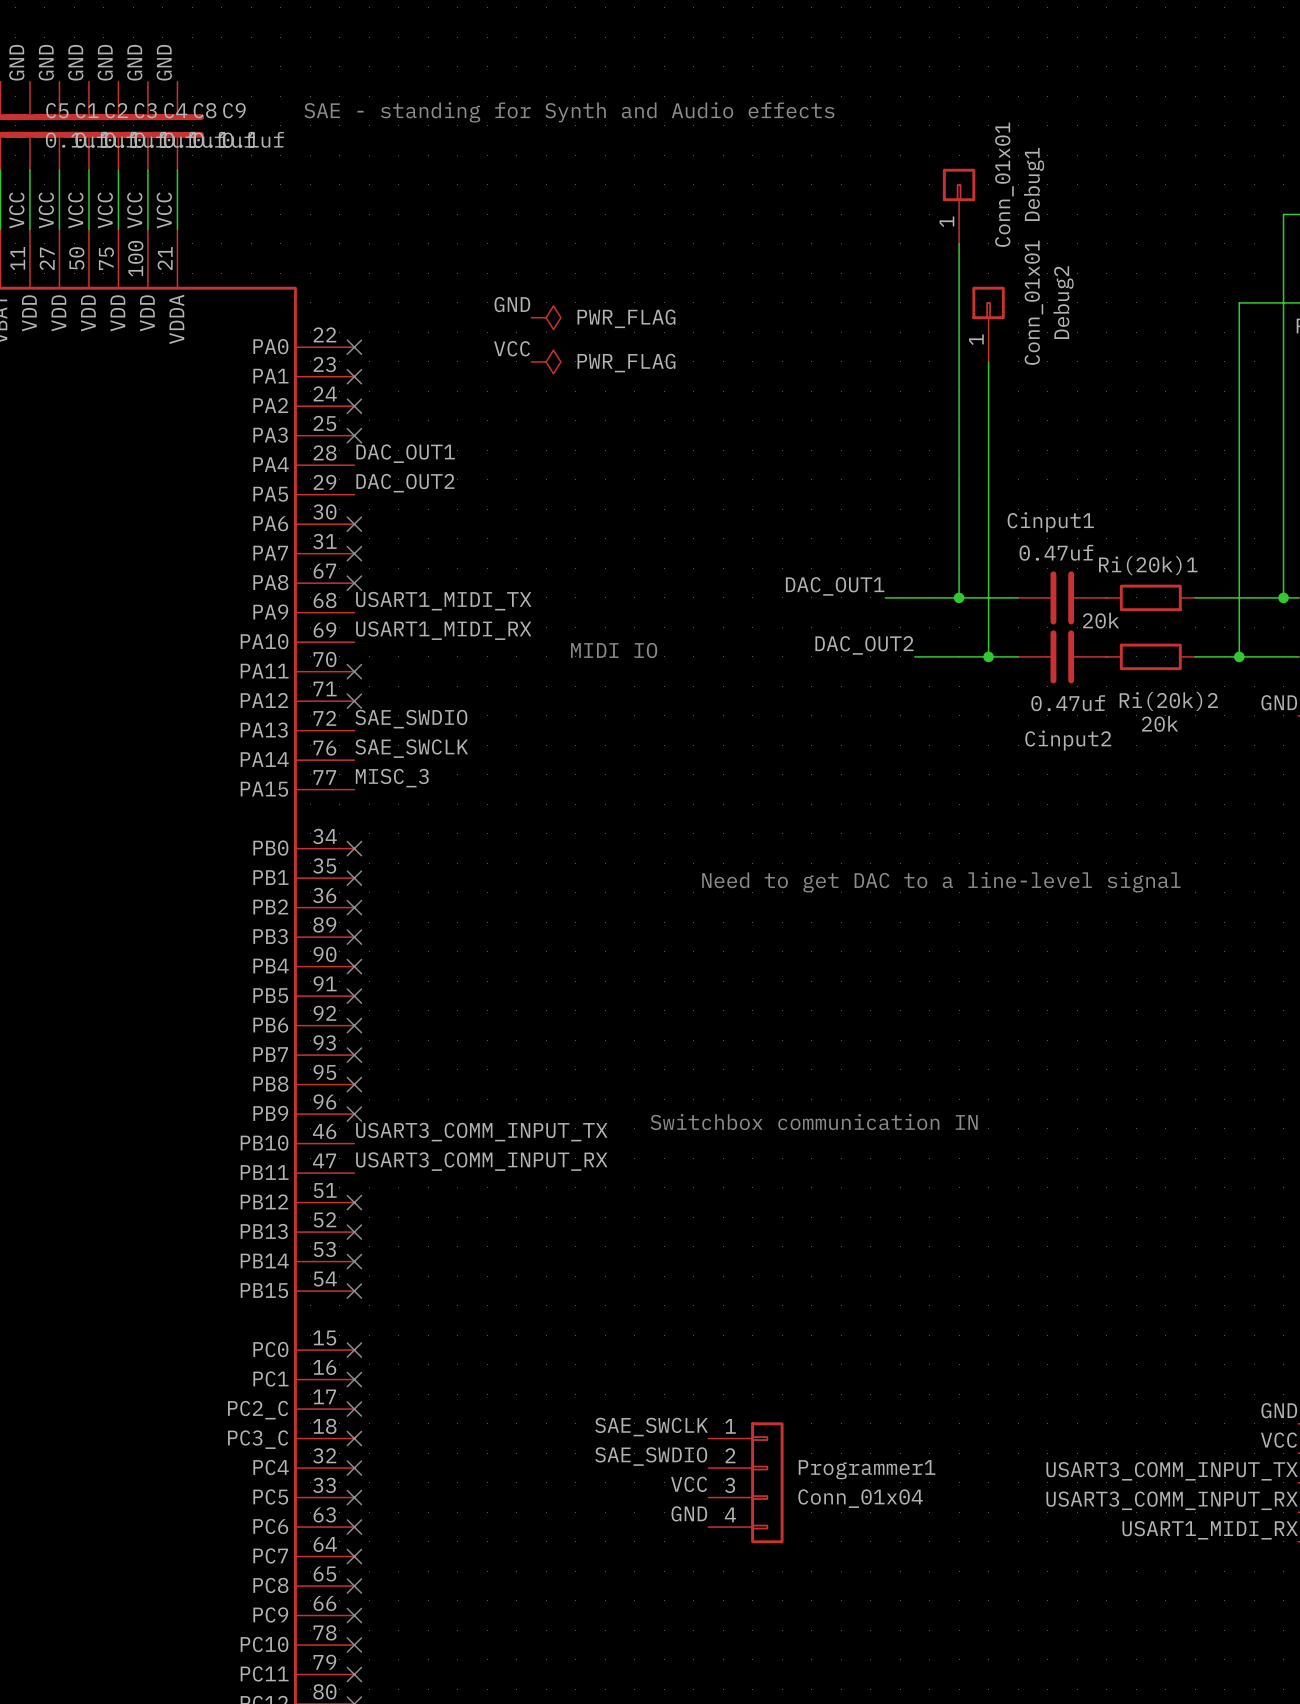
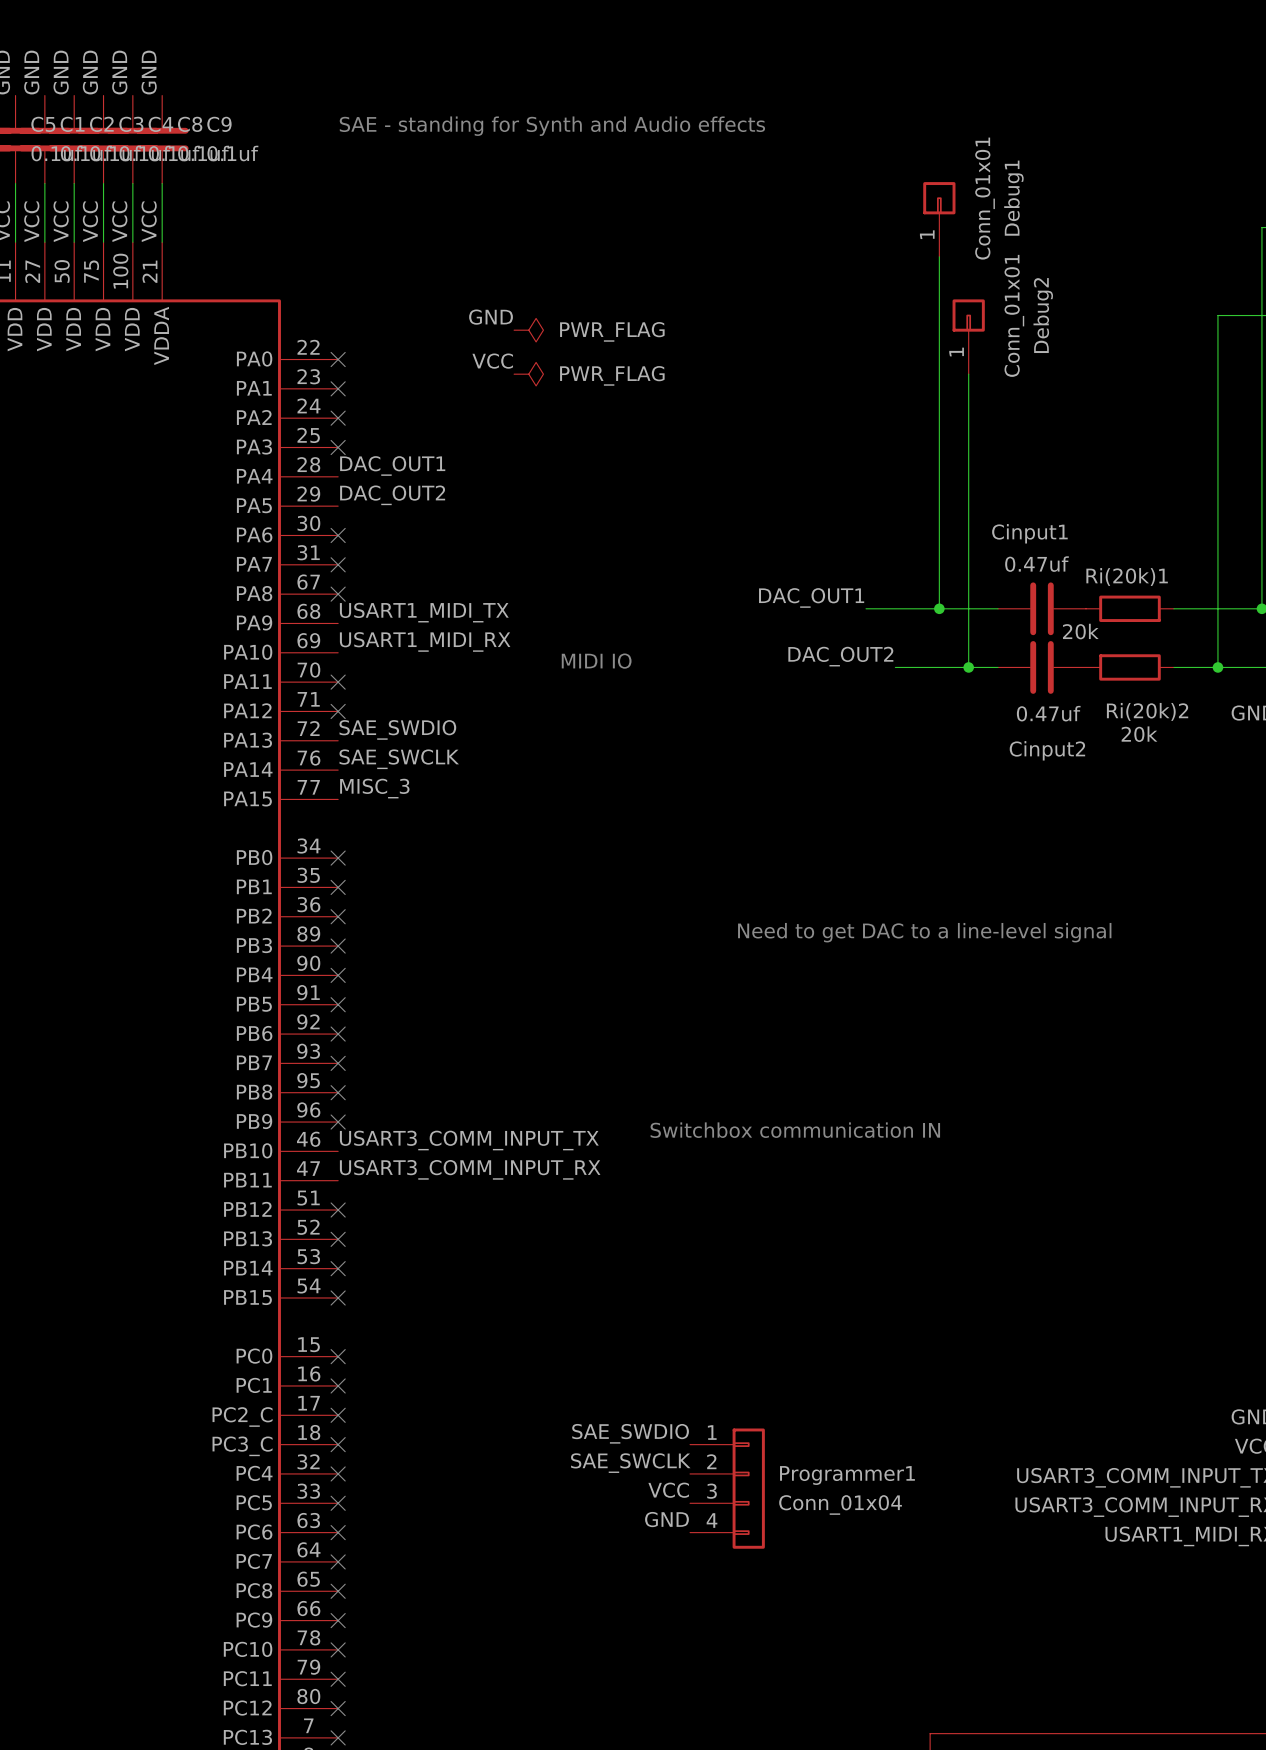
text position: Need to get DAC to a line-level signal (941, 882) -> Need to get DAC to a line-level signal (924, 932)
label: SAE_SWCLK (651, 1427) -> SAE_SWDIO (630, 1433)
label: SAE_SWDIO (651, 1456) -> SAE_SWCLK (630, 1463)

